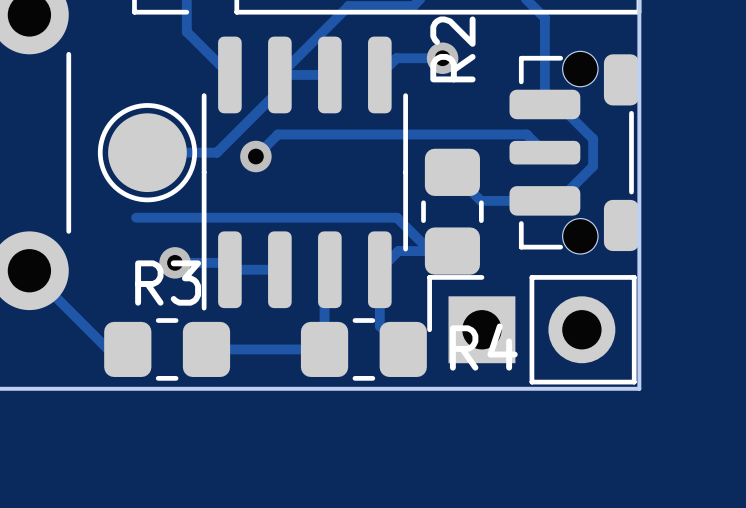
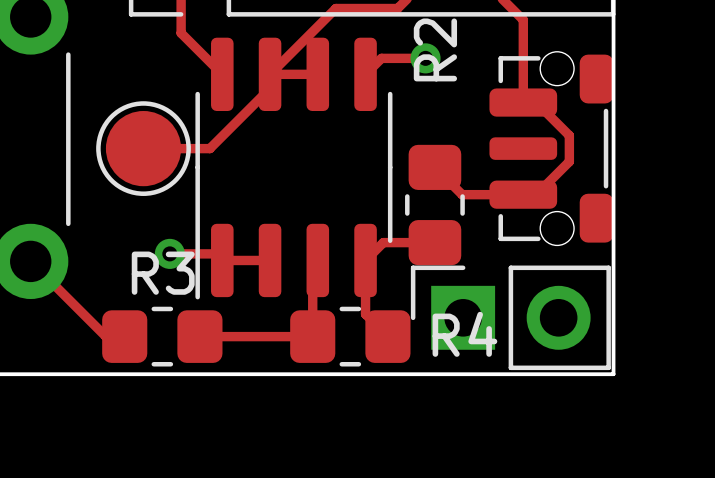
track: (544, 152) (526, 134) (277, 134) (255, 156) -> none
via: (255, 156) -> none
track: (136, 217) (396, 217) (425, 246) (425, 251) -> none

